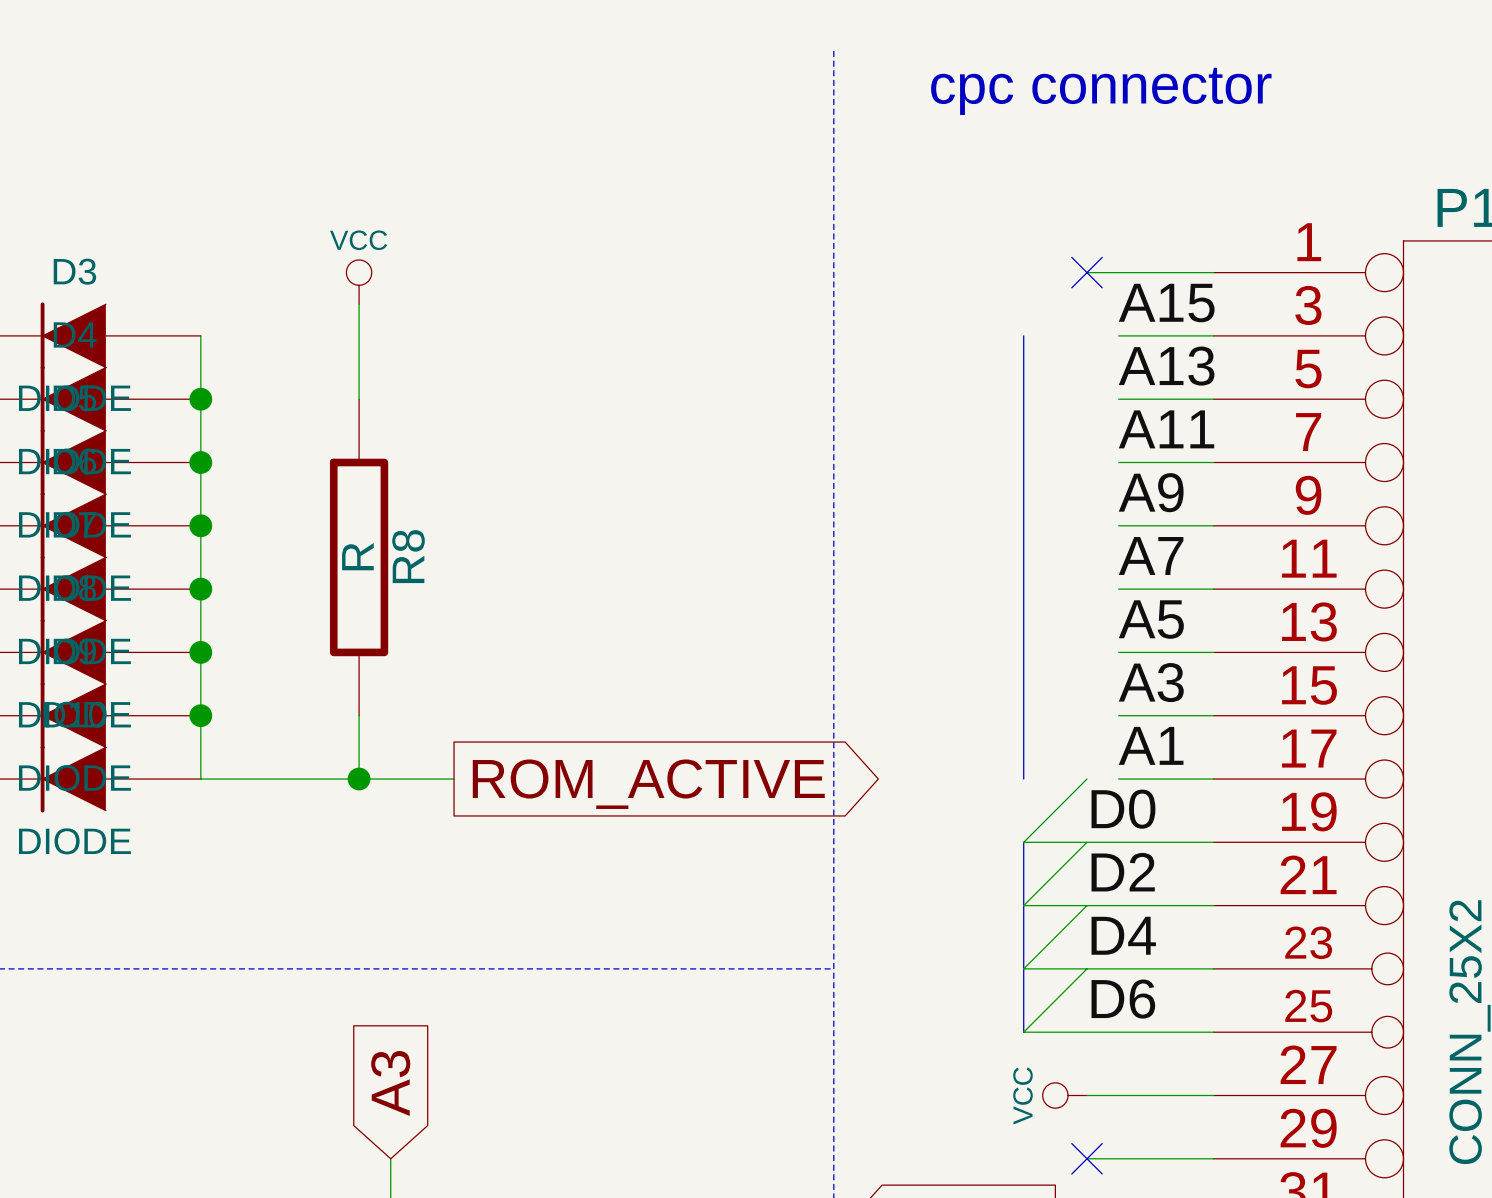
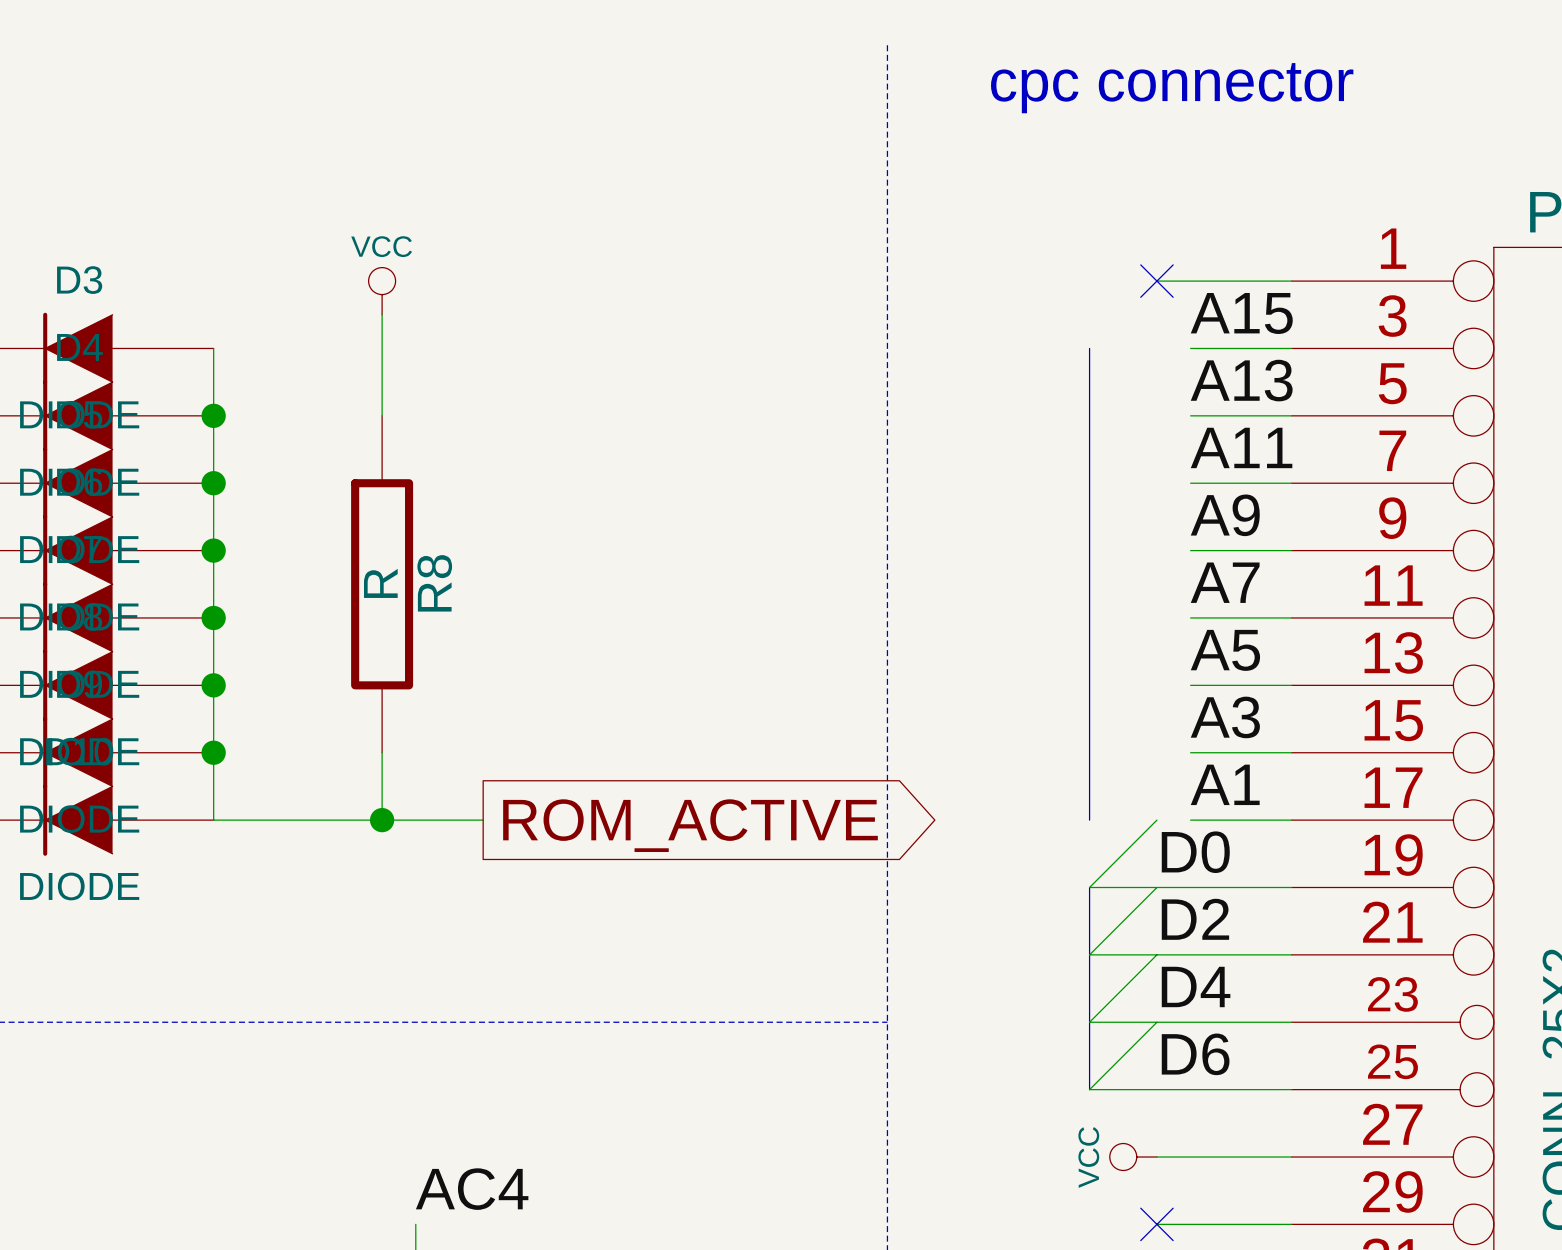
global label: A3 (390, 1083) -> none
label: none -> AC4 (472, 1189)

